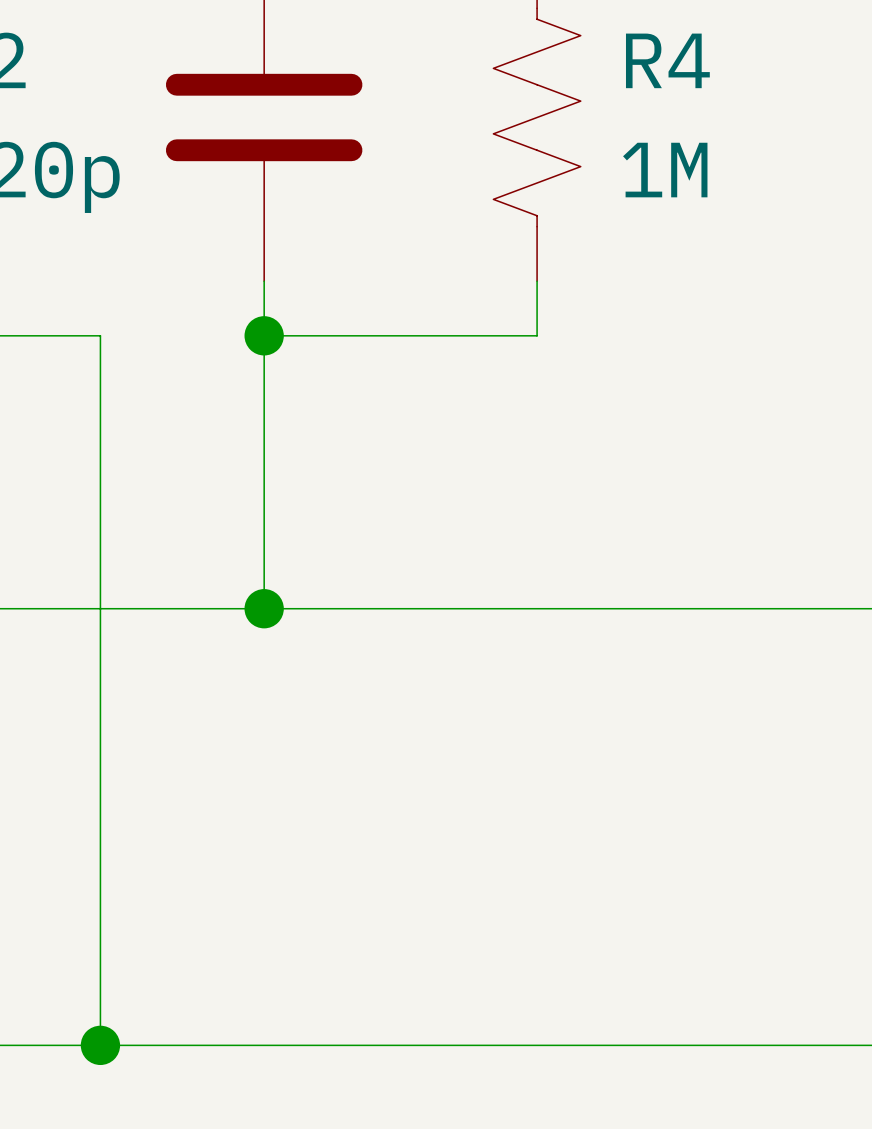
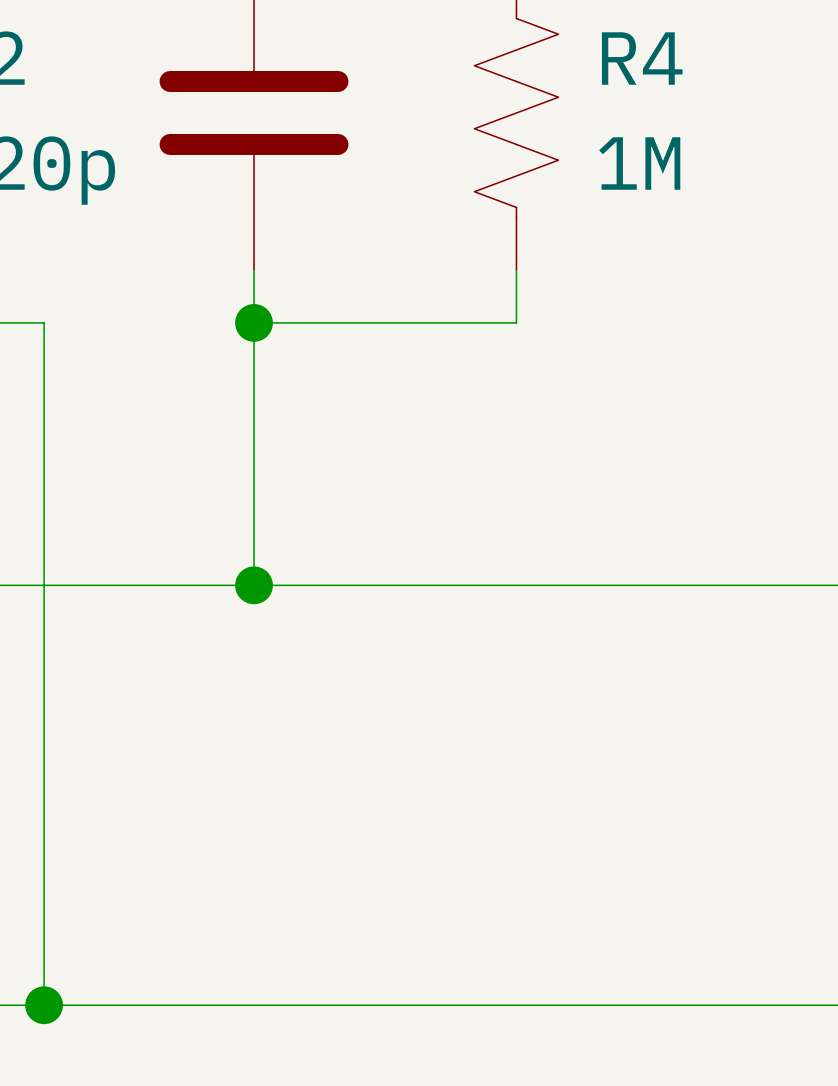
wire: (45, 335) (100, 335) (100, 1045) -> (44, 322) (44, 1005)
junction position: (100, 1045) -> (44, 1005)

